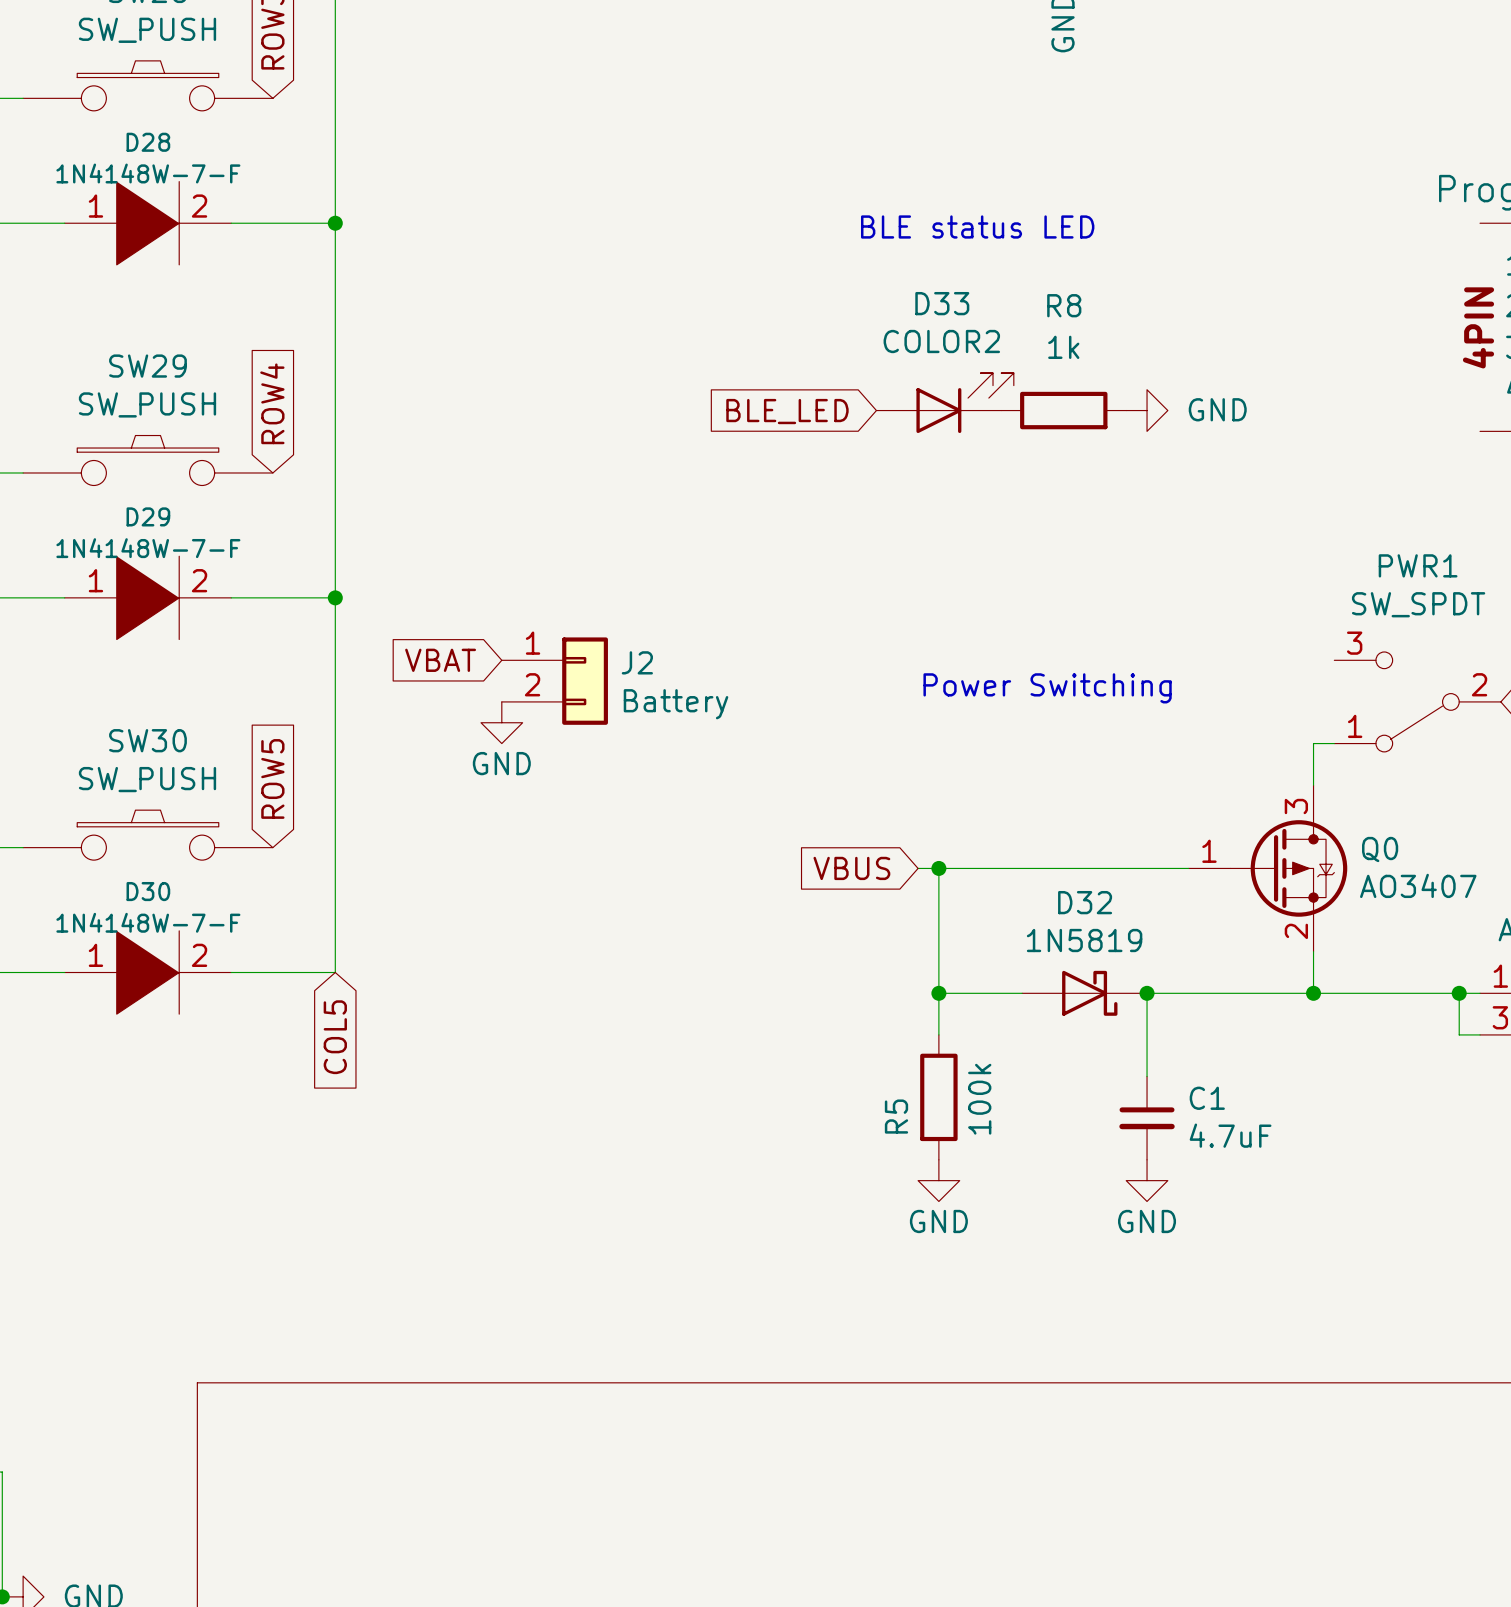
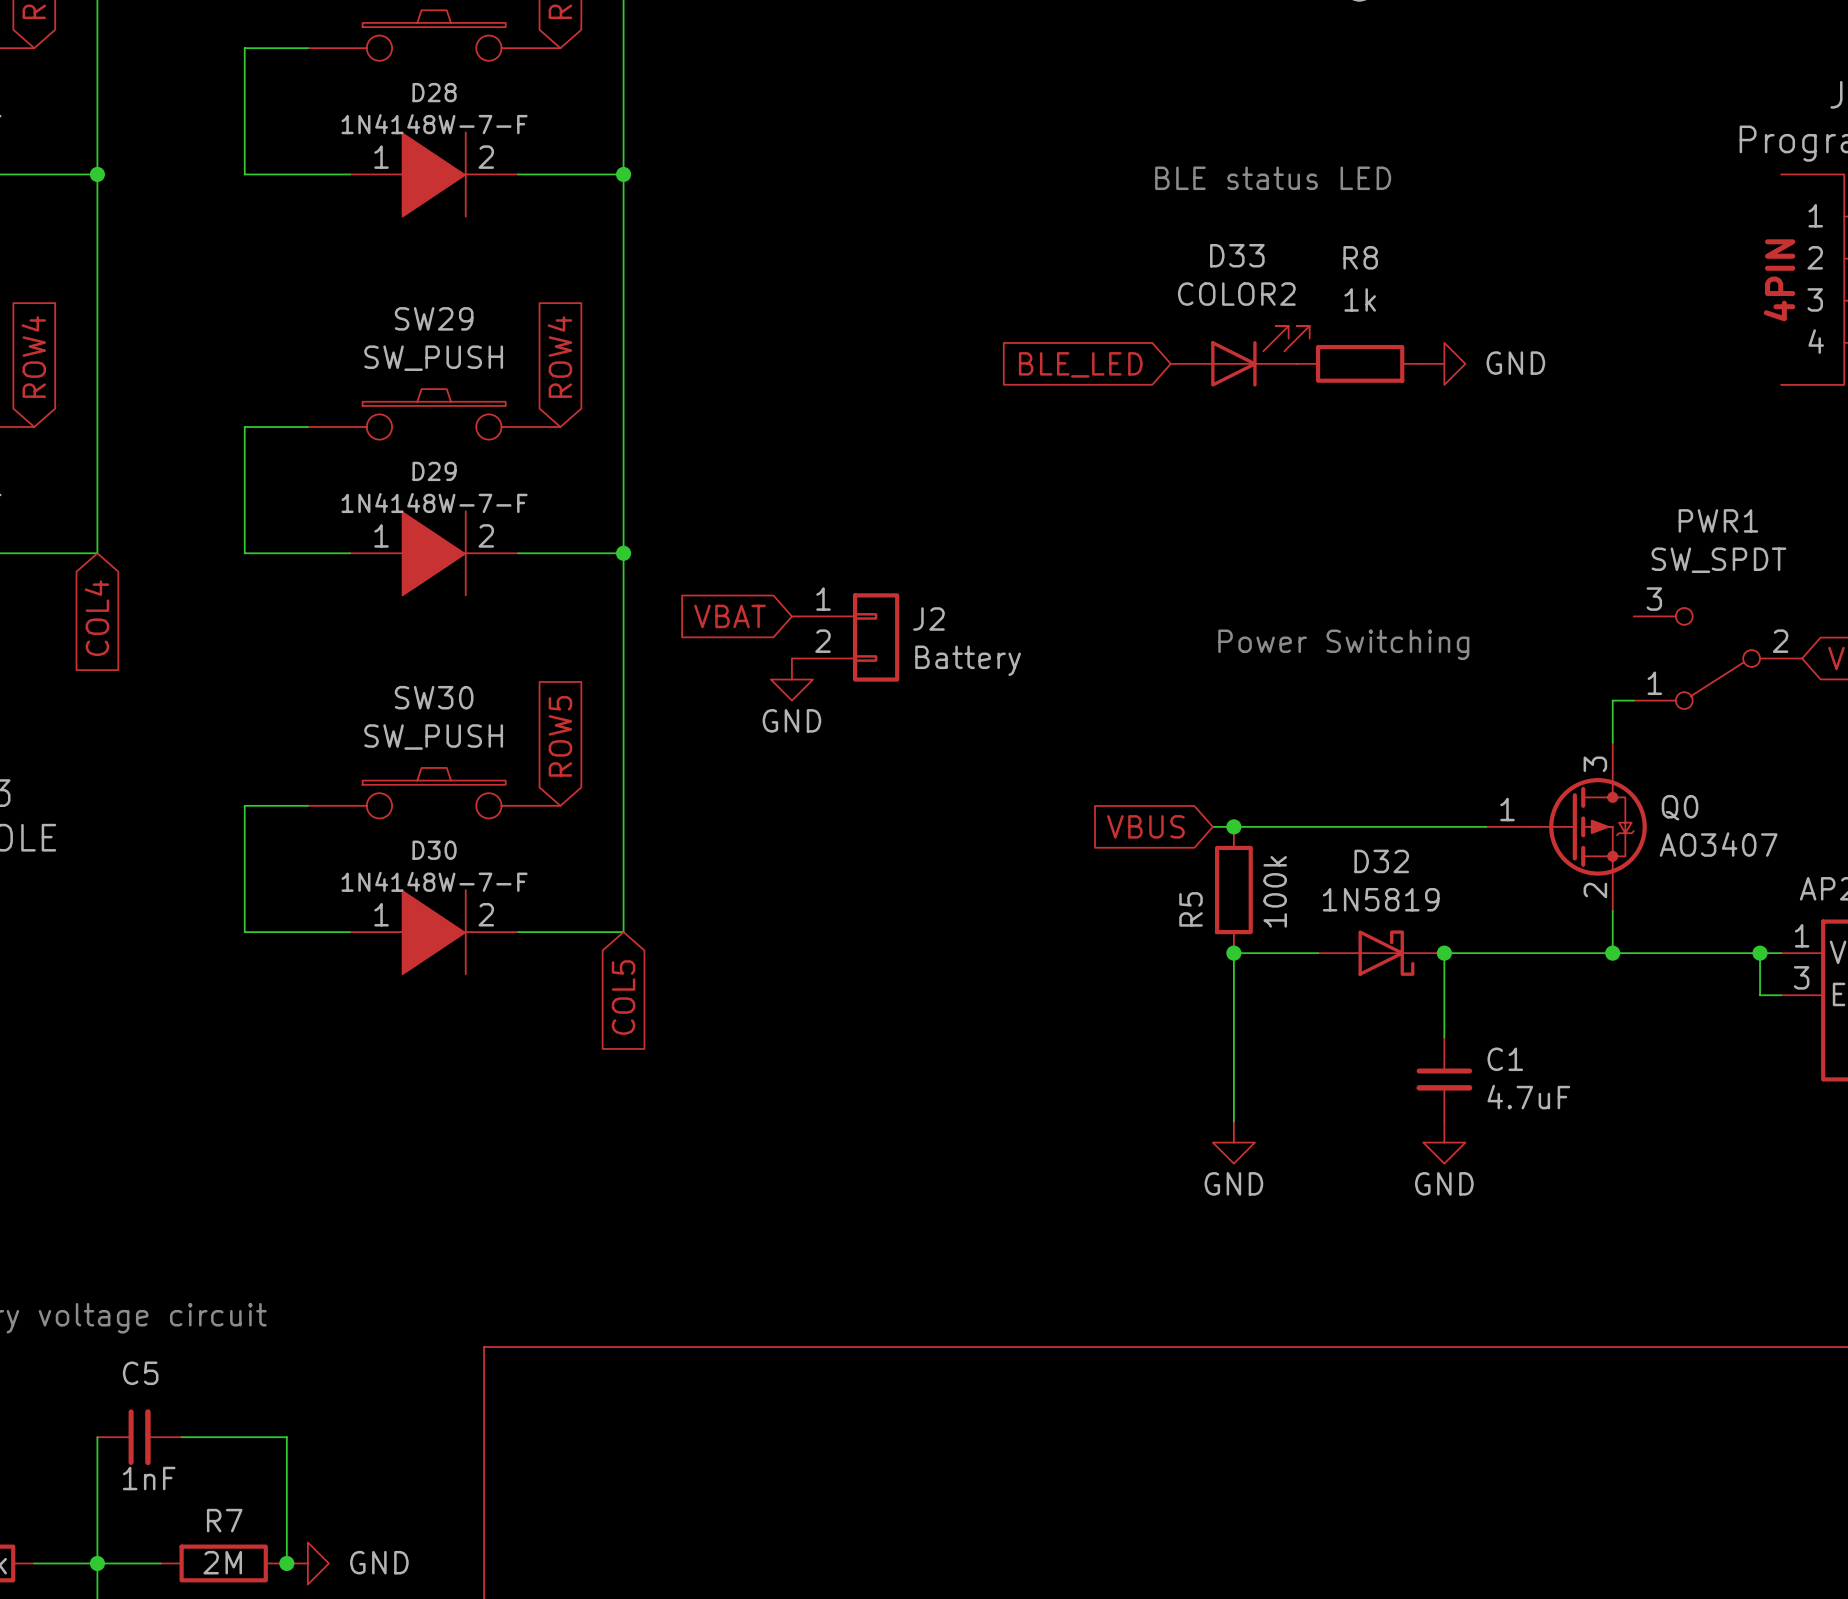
wire: (938, 868) (938, 993) -> (1233, 995) (1233, 1121)
R5 position: (938, 1097) -> (1233, 890)

